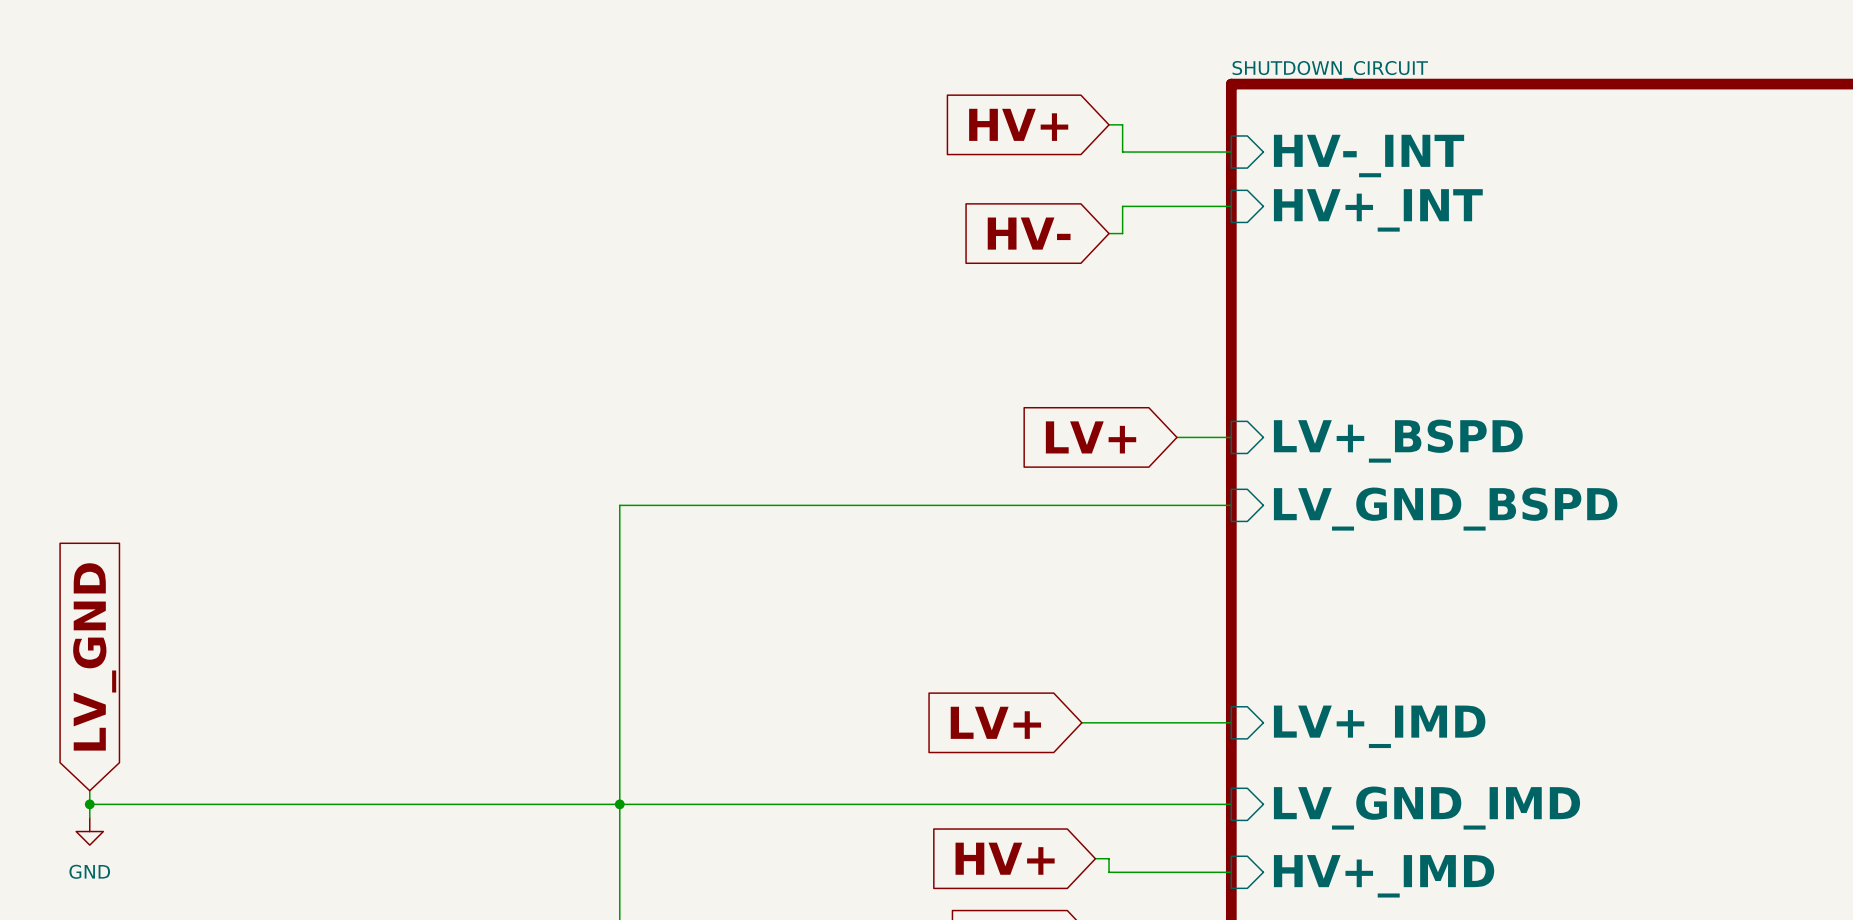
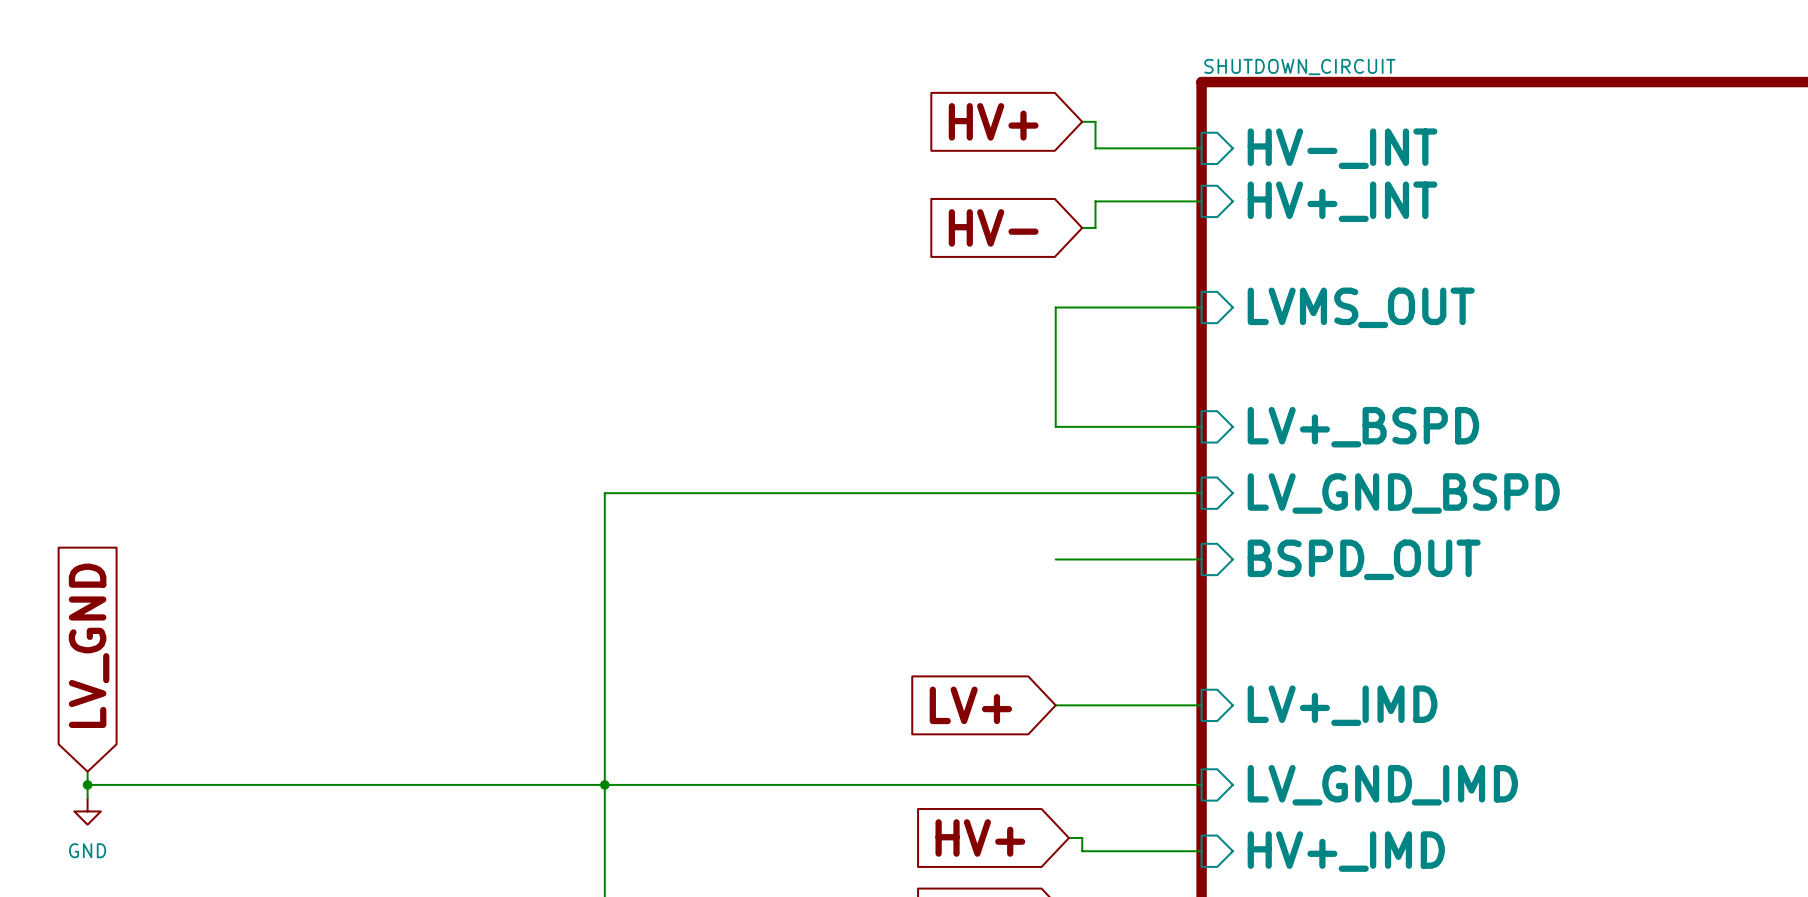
wire: none -> (1201, 307) (1055, 307) (1055, 426) (1148, 426)
sheet pin: none -> LVMS_OUT (1361, 307)
global label: LV+ (1091, 437) -> none
wire: none -> (1055, 559) (1201, 559)
sheet pin: none -> BSPD_OUT (1364, 559)

